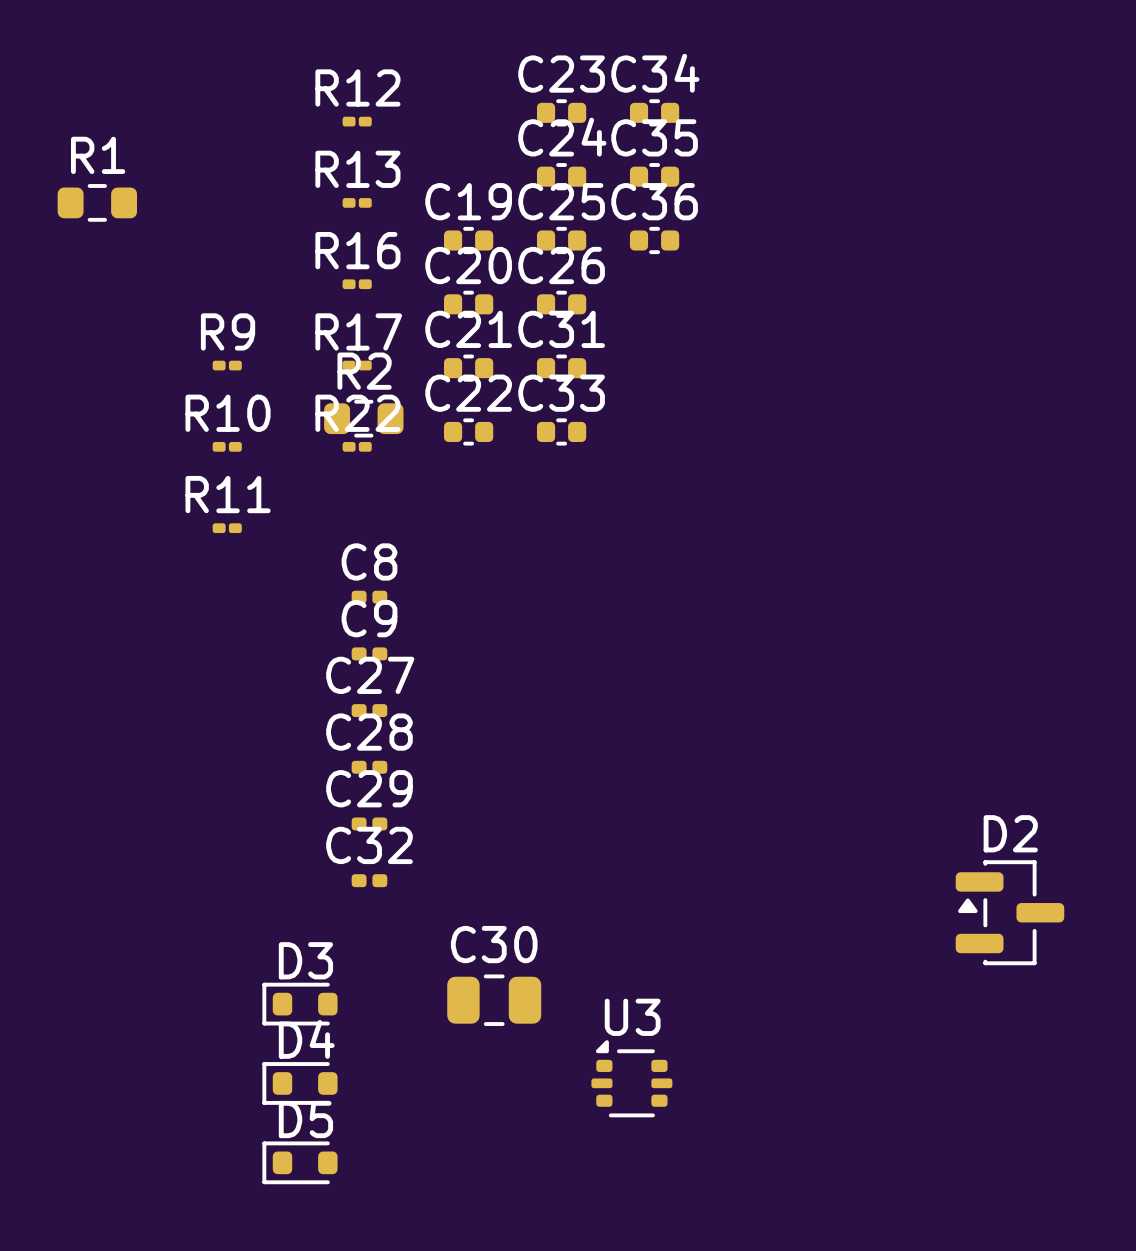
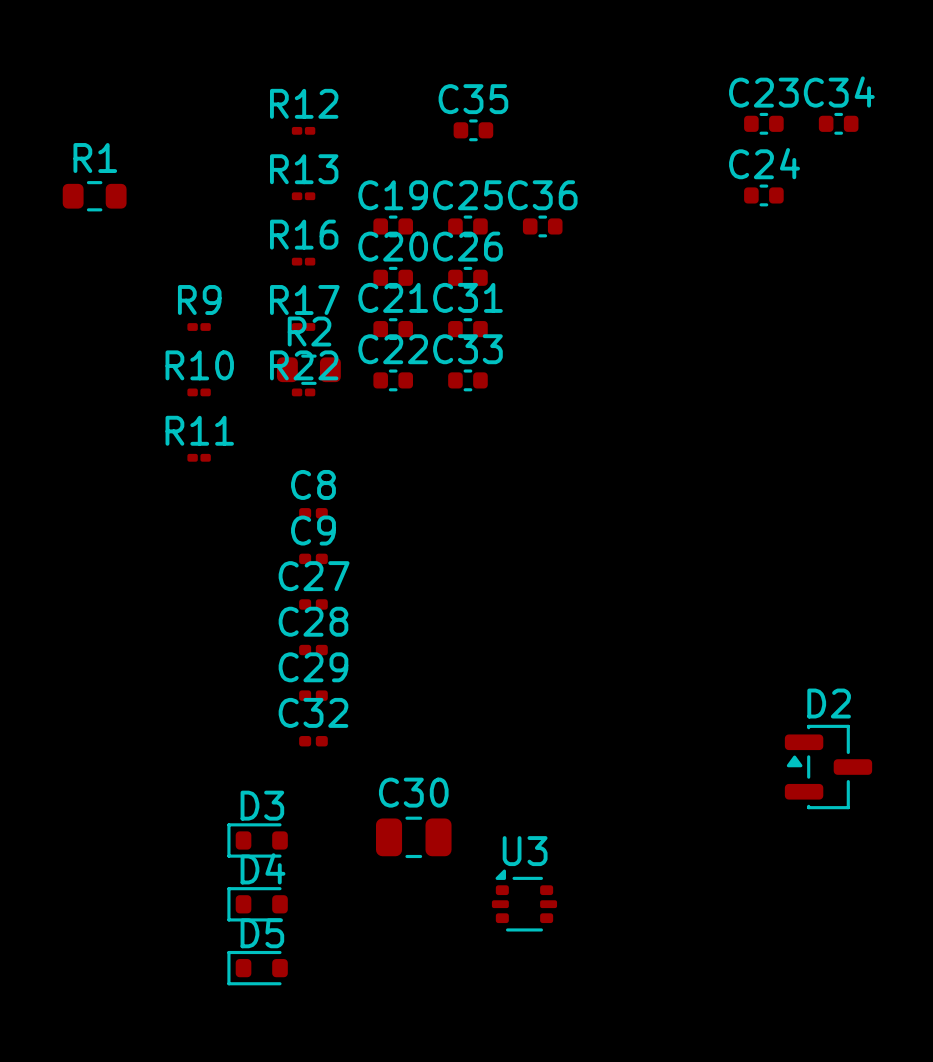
C23 position: (561, 112) -> (763, 123)
C34 position: (654, 112) -> (838, 123)
C24 position: (561, 176) -> (763, 195)
C35 position: (654, 176) -> (473, 130)

